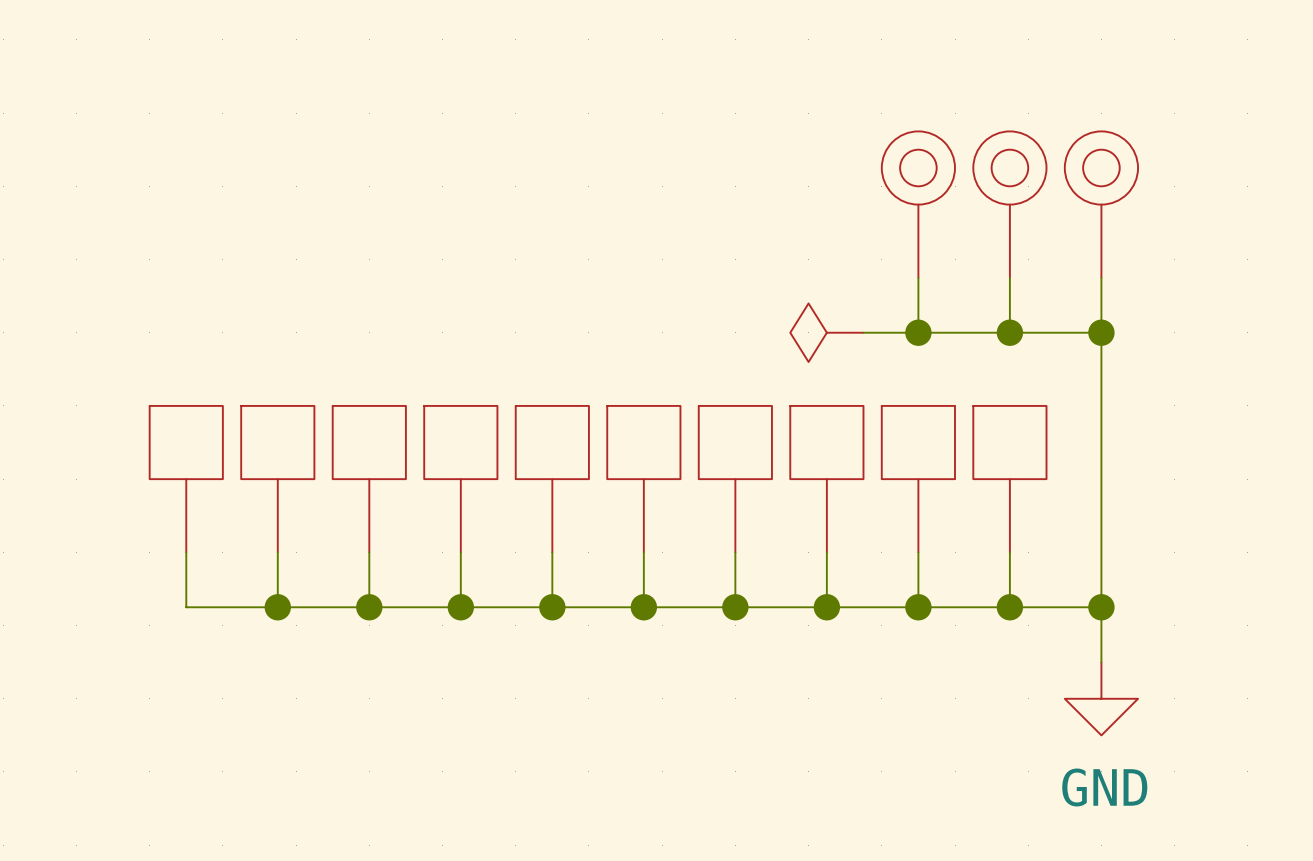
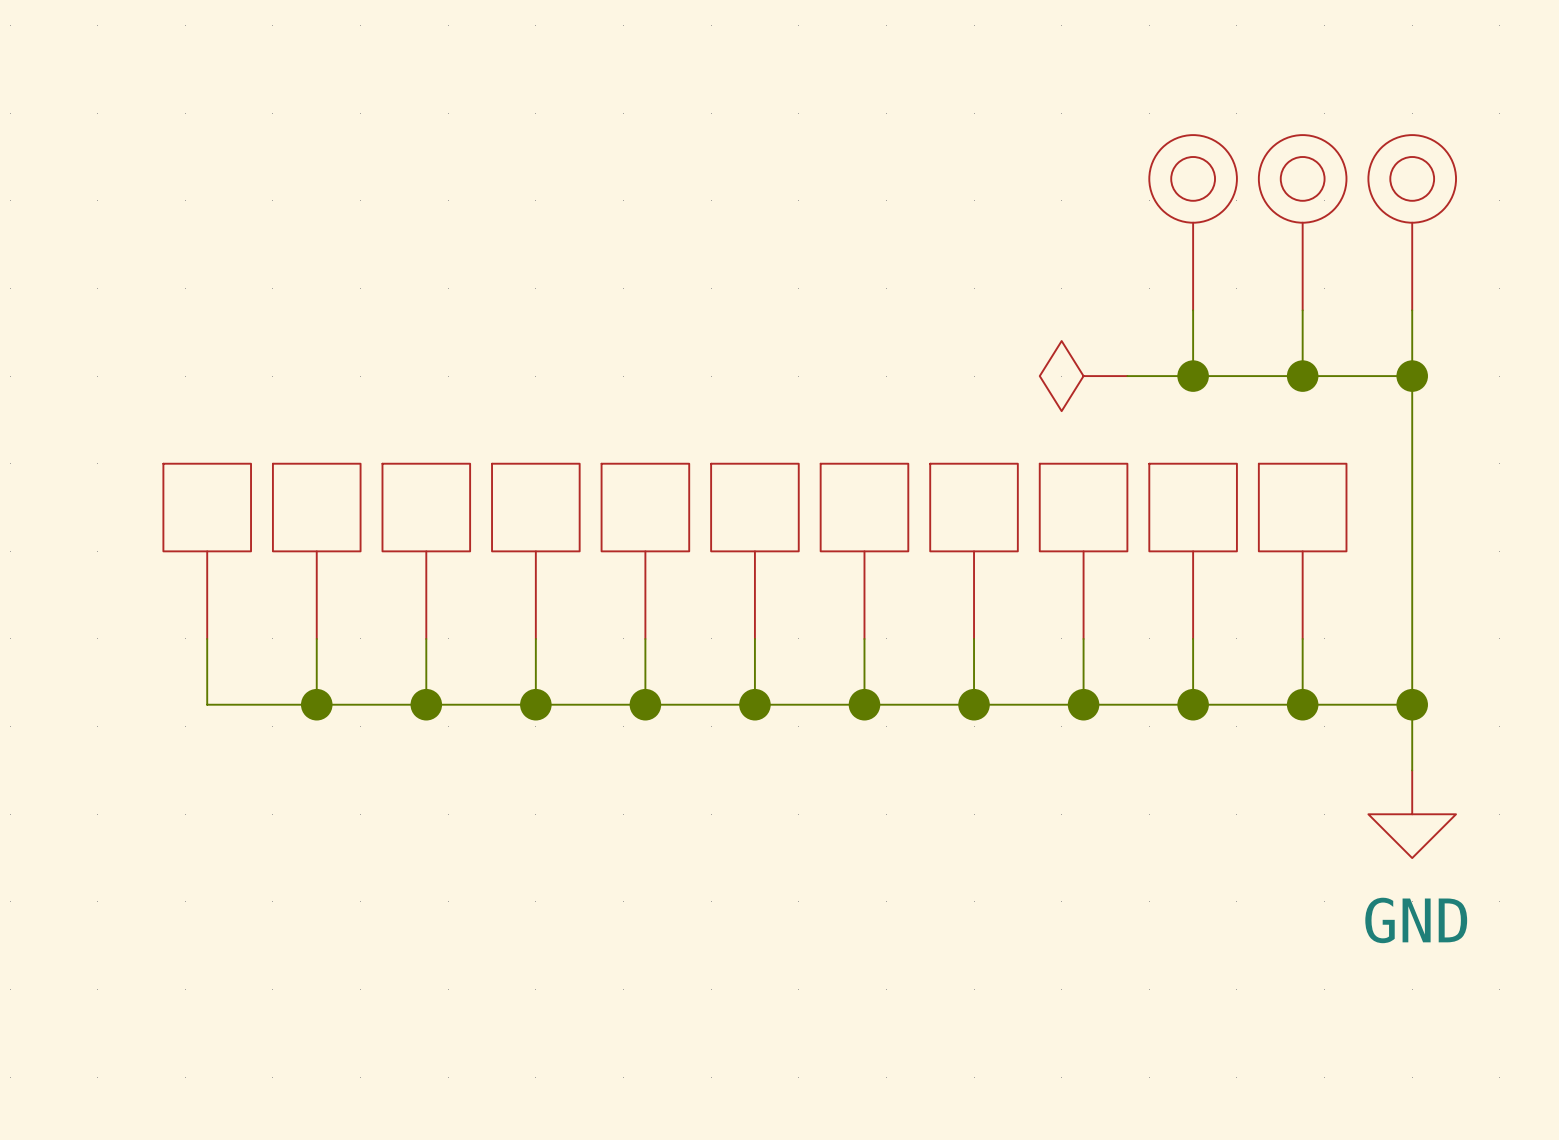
part: none -> (207, 551)
wire: none -> (207, 638) (207, 704) (316, 704)
junction: none -> (316, 704)

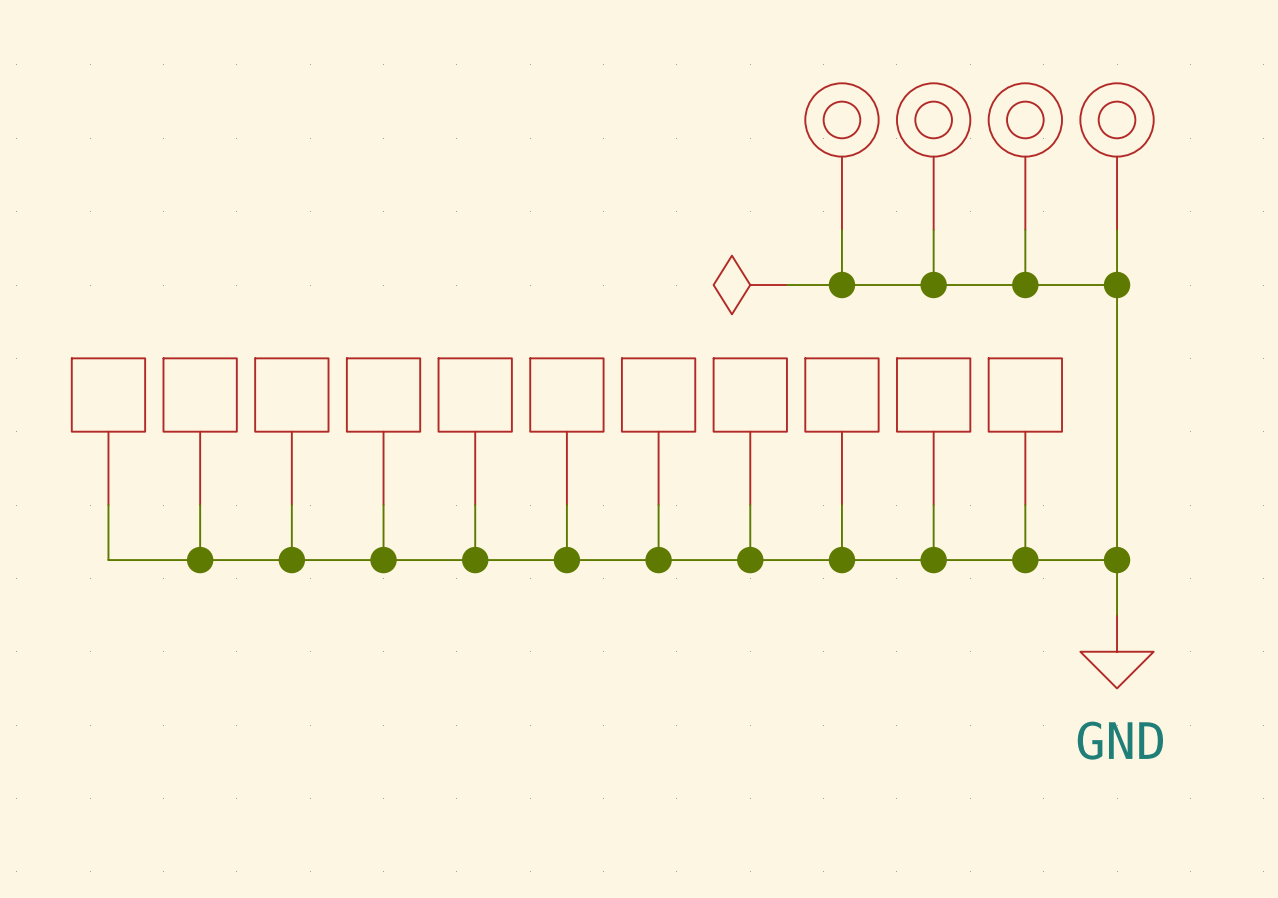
part: none -> (841, 156)
wire: none -> (841, 229) (841, 285)
wire: none -> (786, 285) (878, 285)
power symbol position: (1083, 376) -> (750, 285)
junction: none -> (841, 285)

